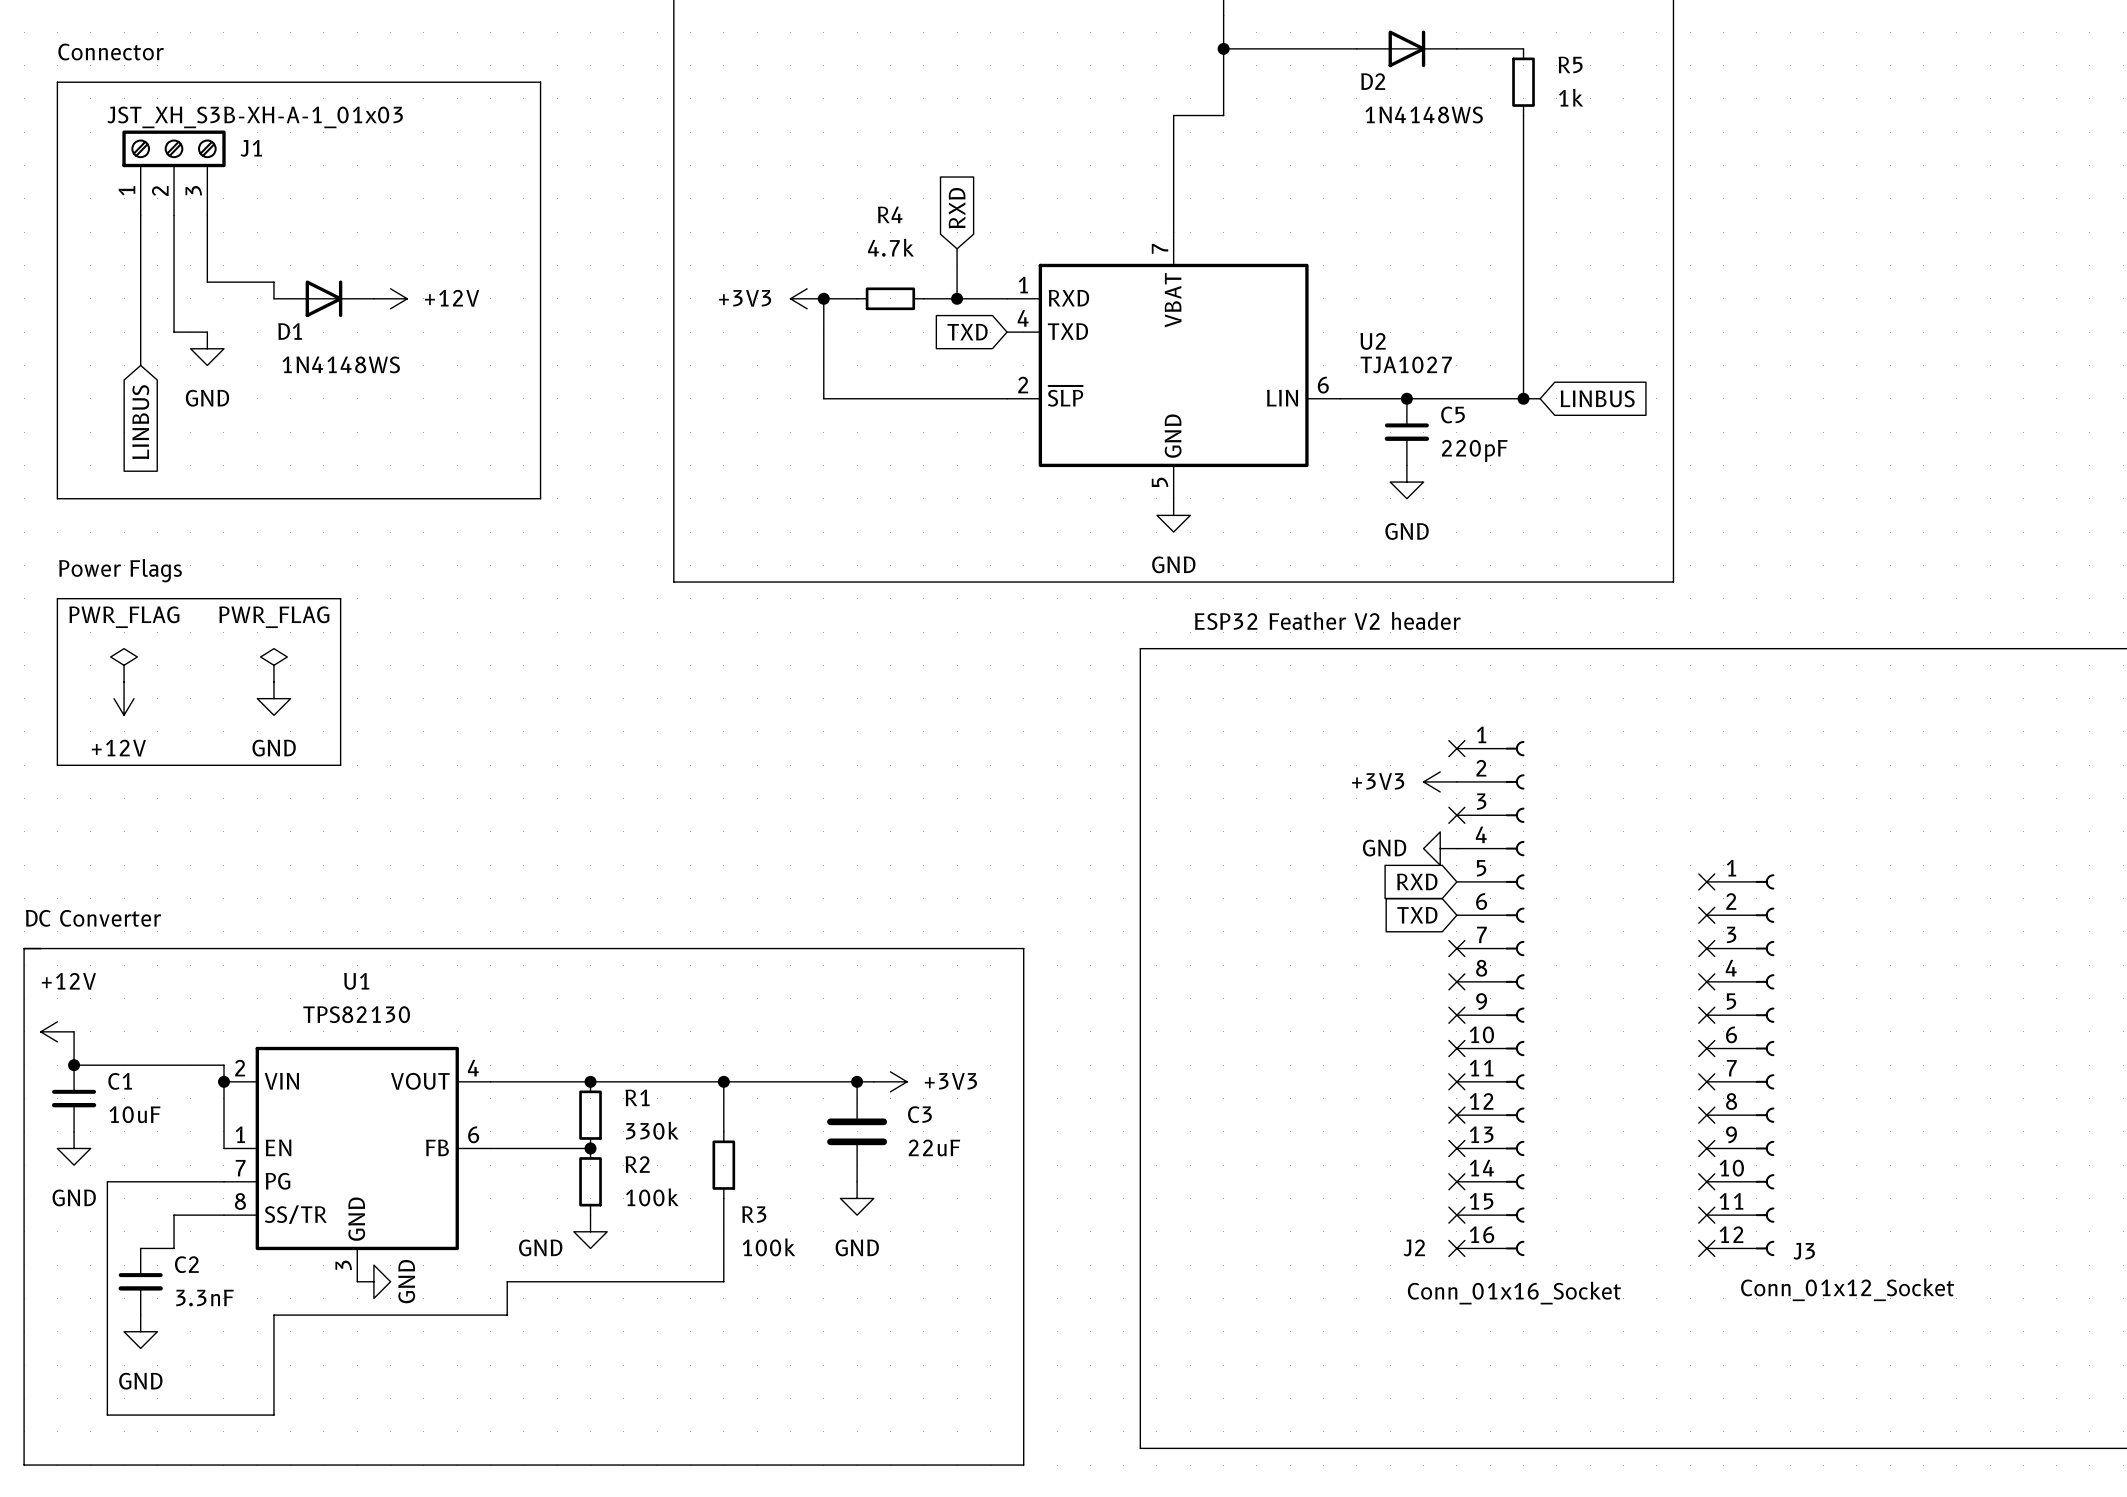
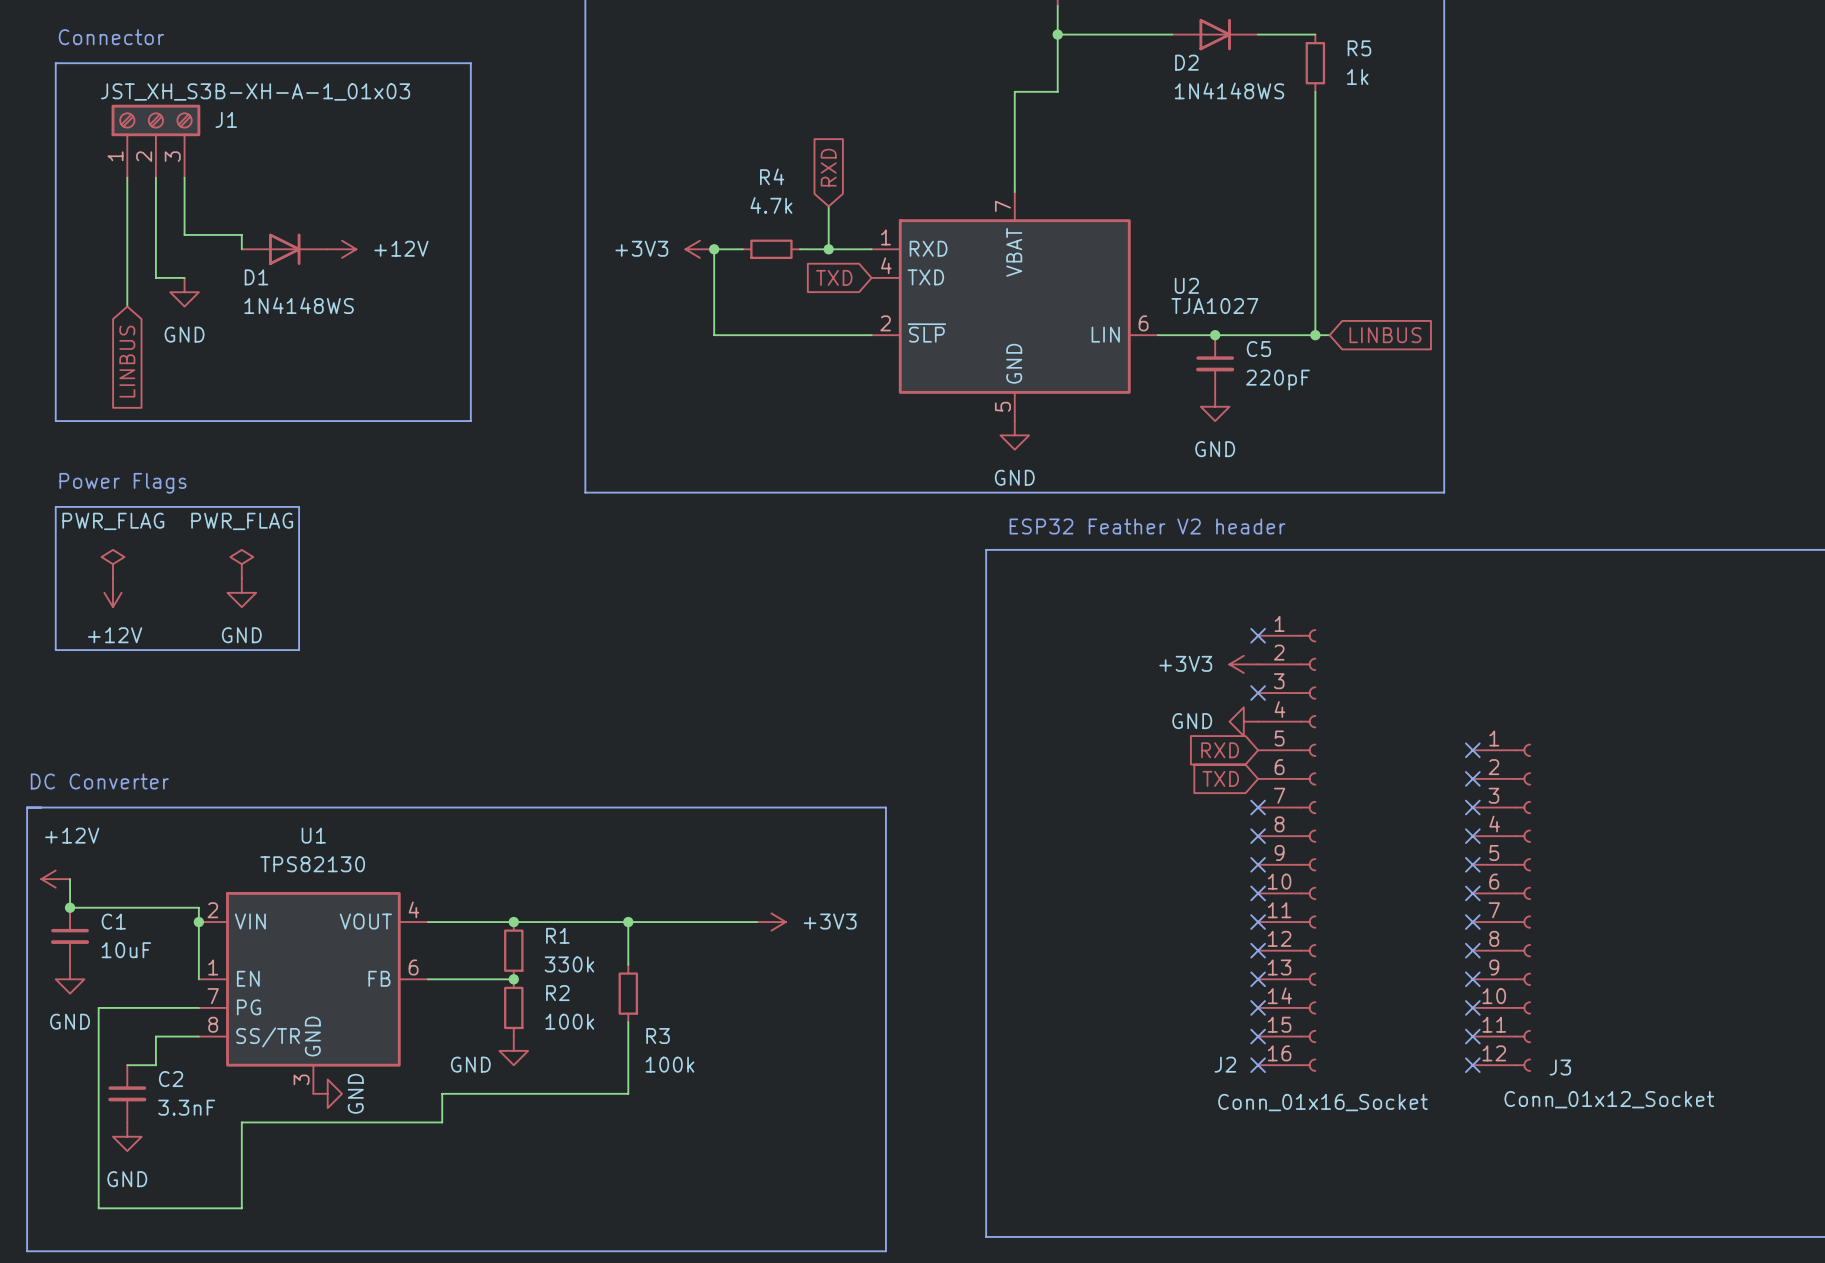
junction: (857, 1081) -> none
C3: 22uF (857, 1131) -> none
power symbol: GND (857, 1198) -> none

